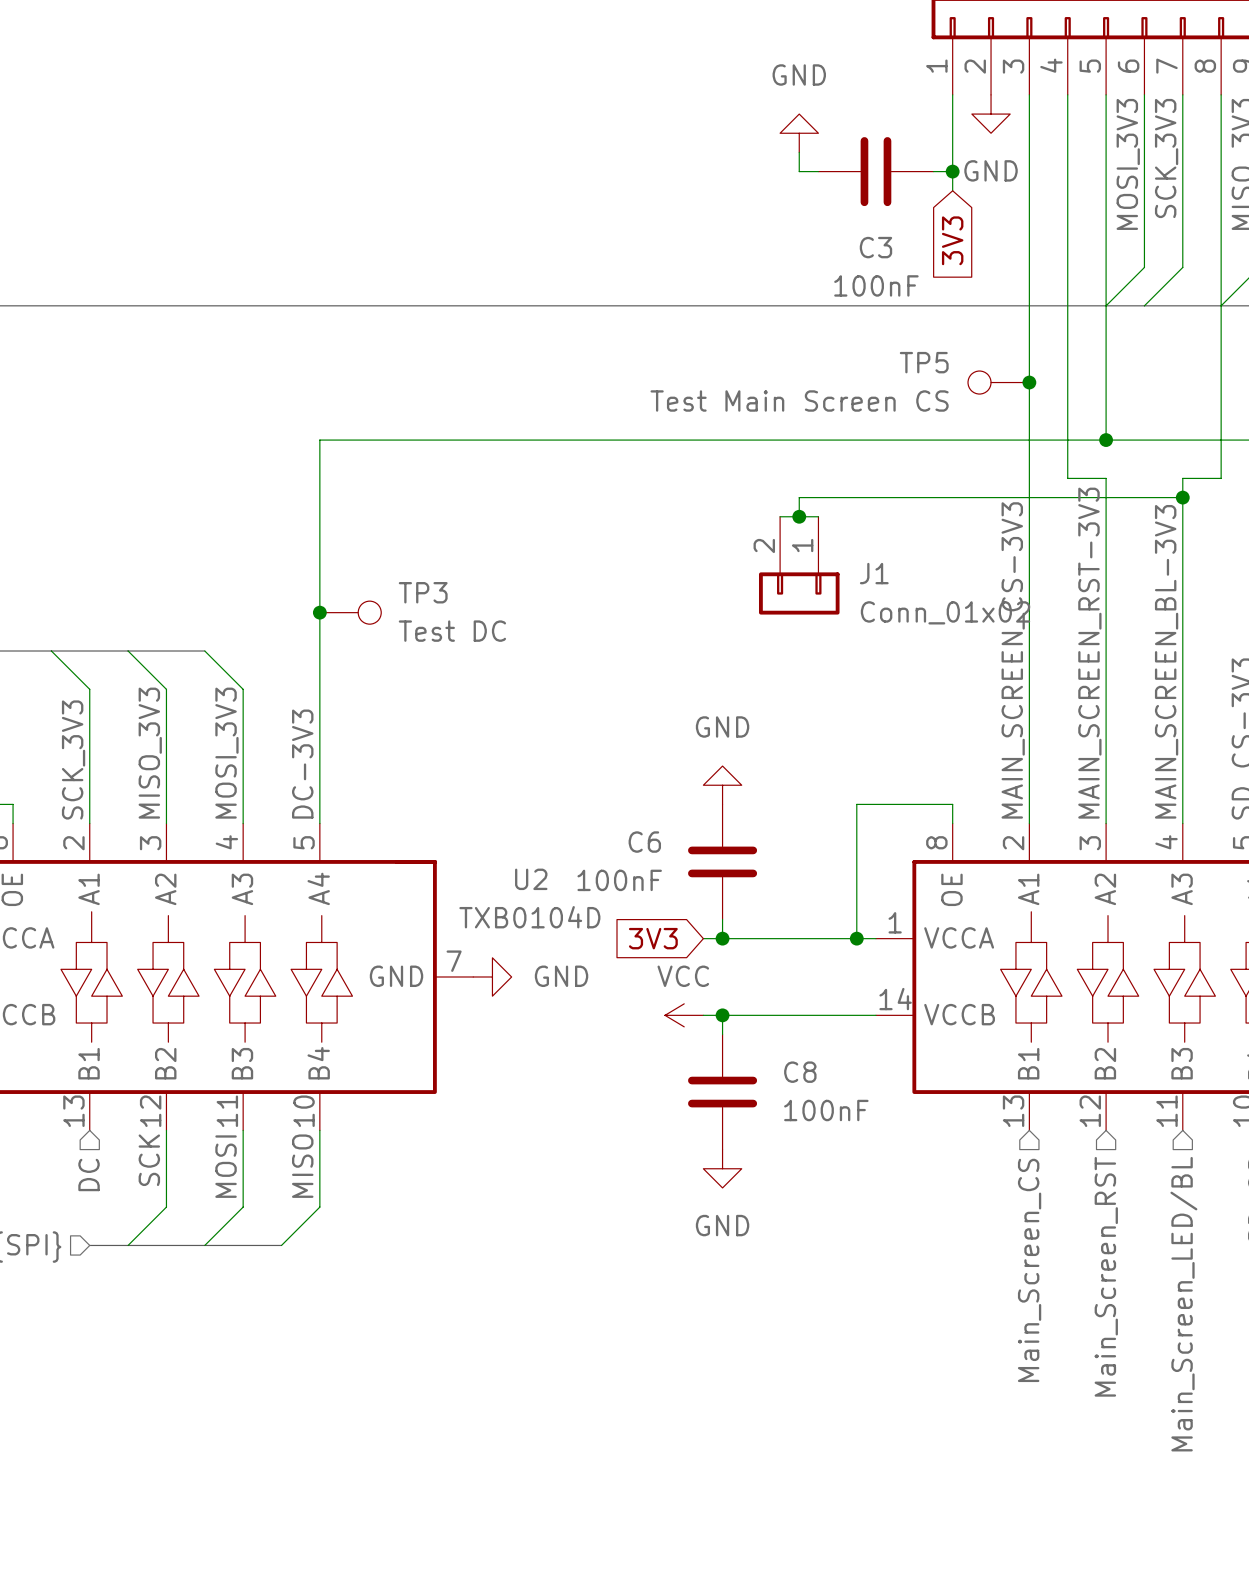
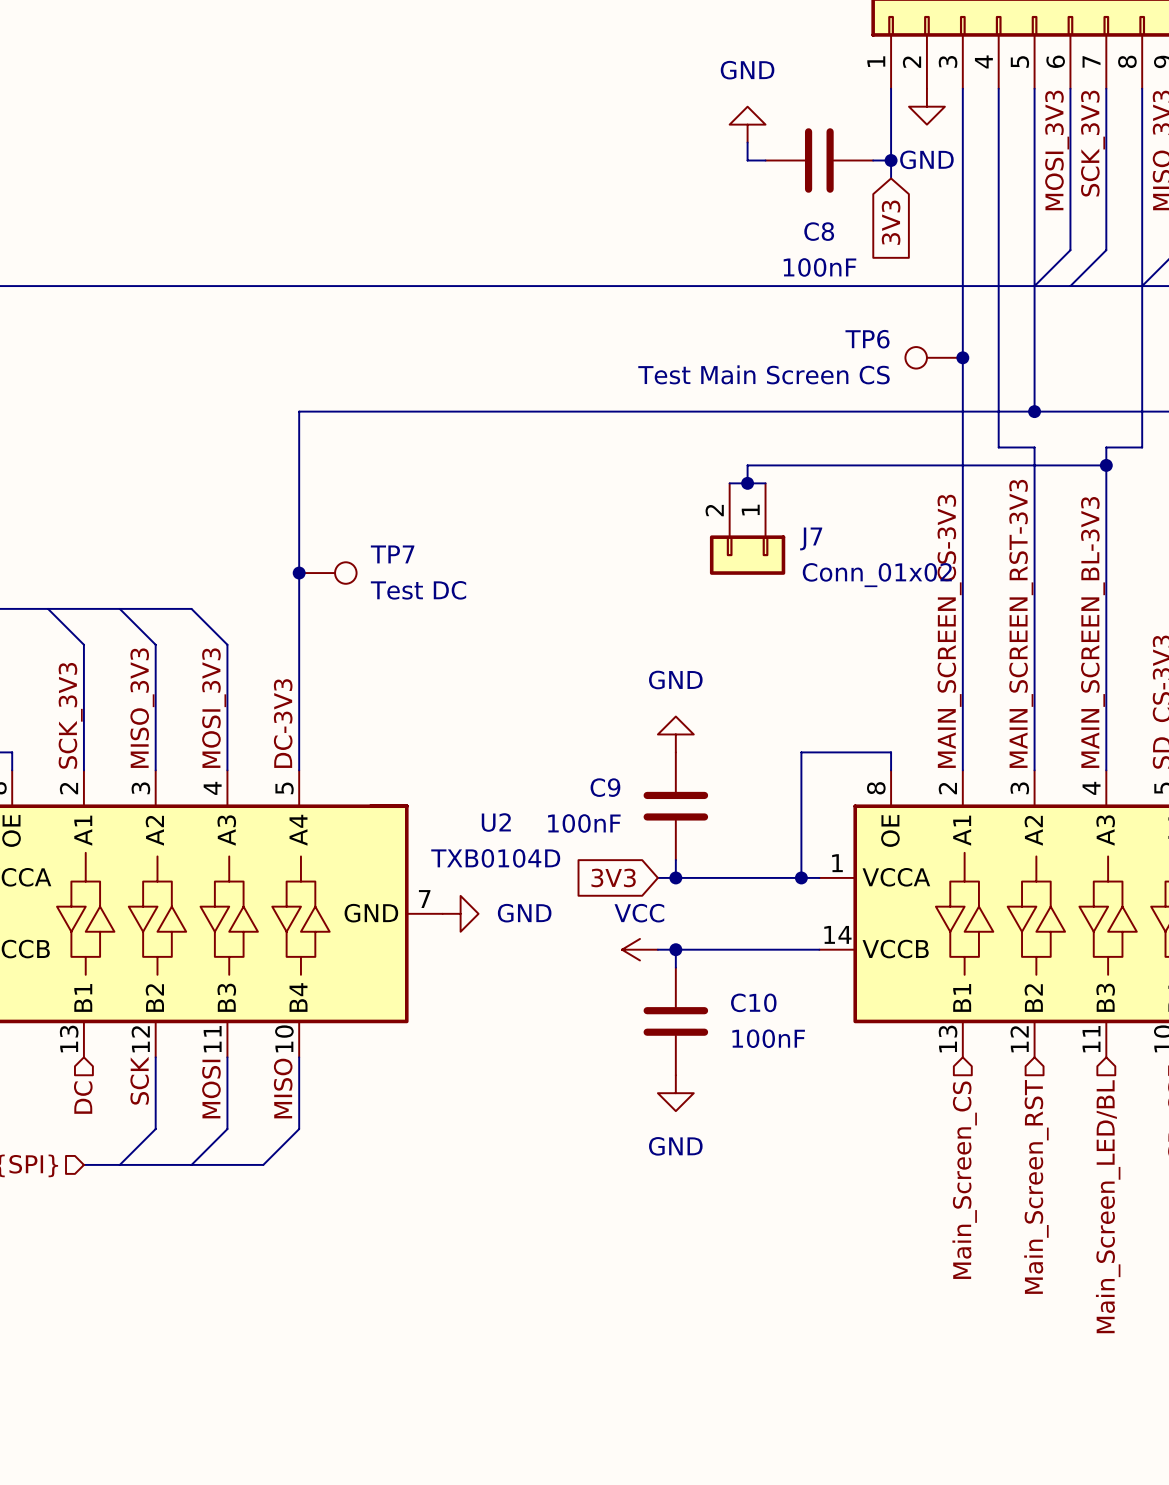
C3 name: C3 (875, 247) -> C8 (819, 231)
TP5 name: TP5 (924, 362) -> TP6 (867, 339)
J1 name: J1 (874, 573) -> J7 (811, 538)
TP3 name: TP3 (423, 592) -> TP7 (392, 554)
C6 name: C6 (644, 842) -> C9 (605, 787)
C8 name: C8 (800, 1072) -> C10 (753, 1002)

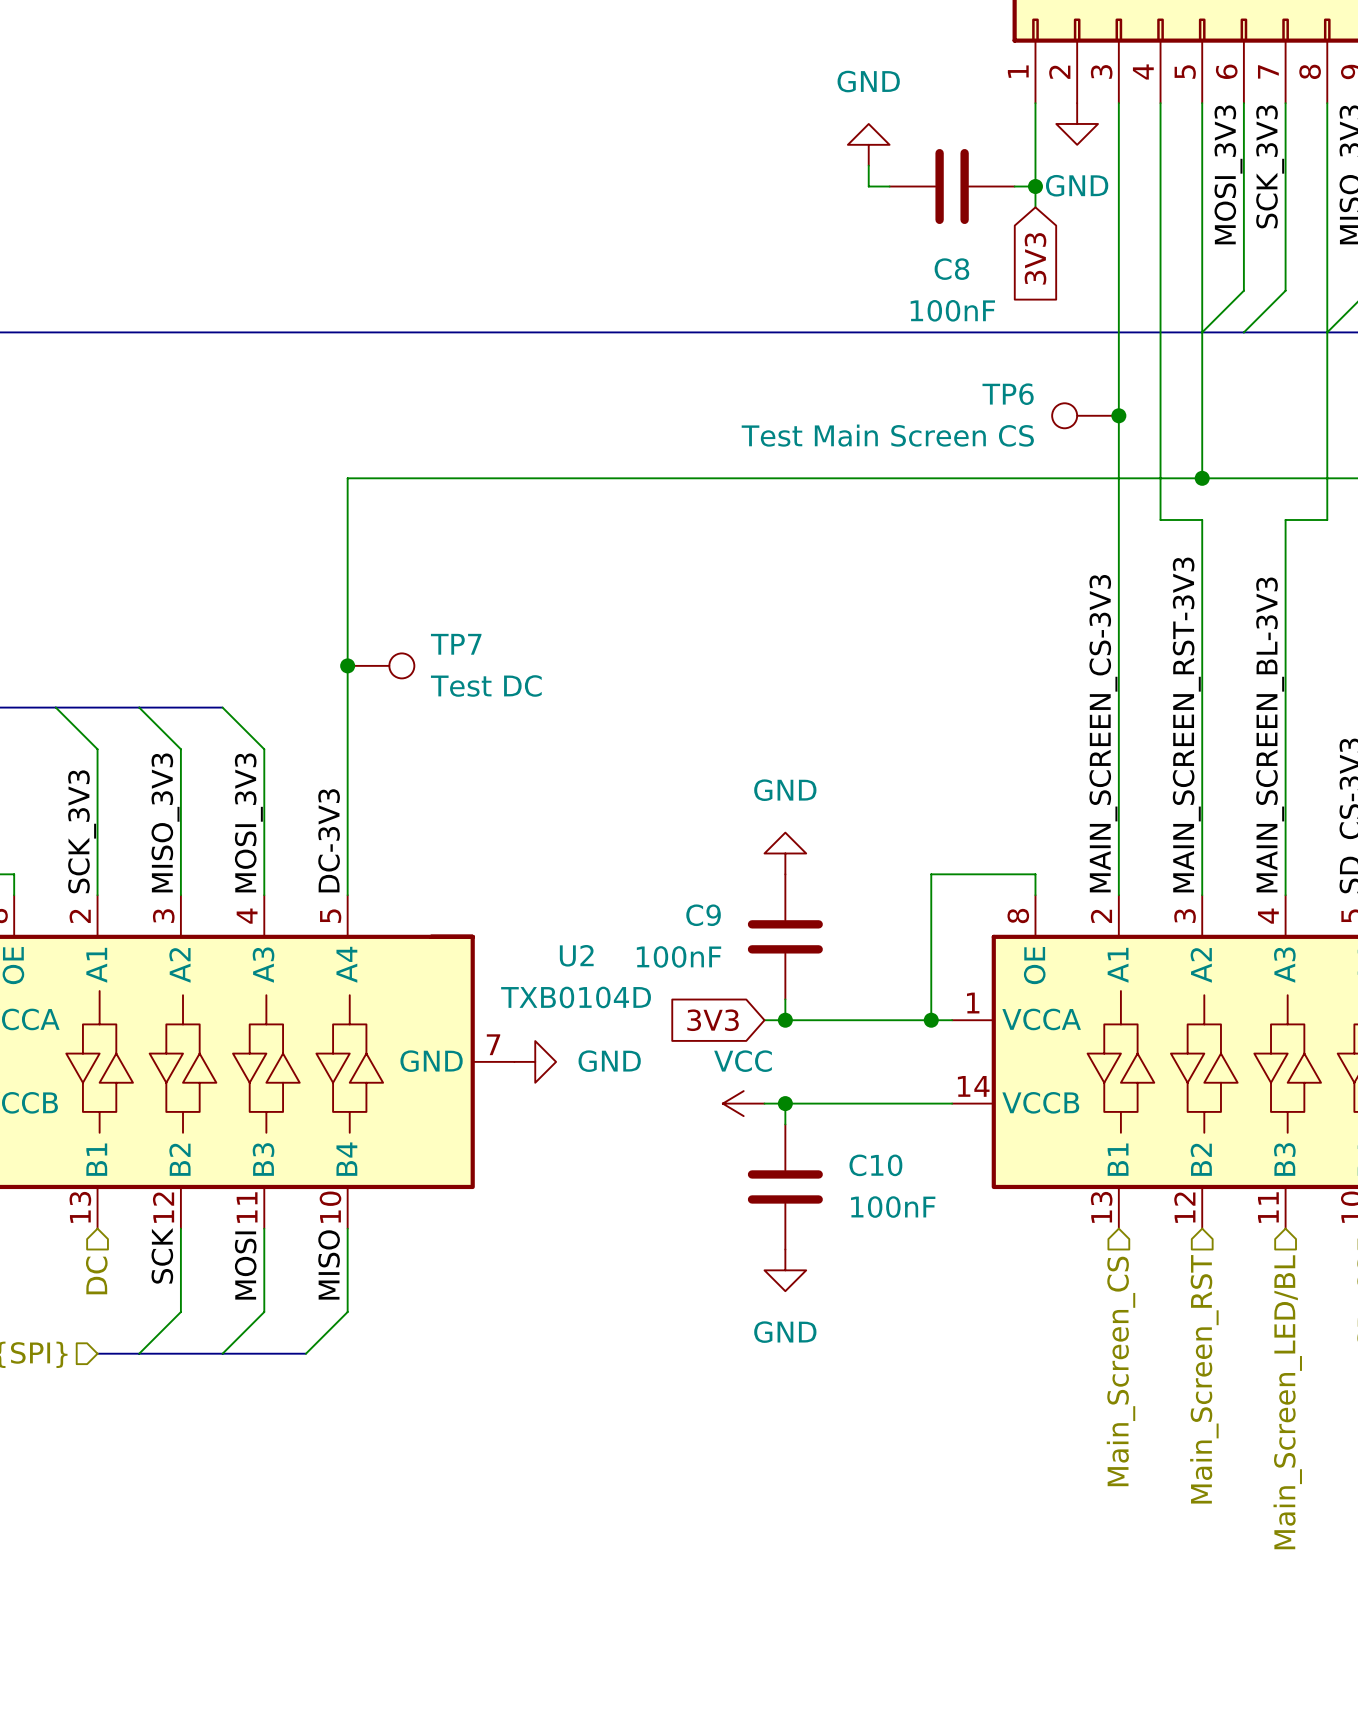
wire: (1106, 465) (747, 465) (747, 483) -> none
junction: (1106, 465) -> none
wire: (729, 483) (765, 483) -> none
junction: (747, 483) -> none
J7: Conn_01x02 (747, 529) -> none

